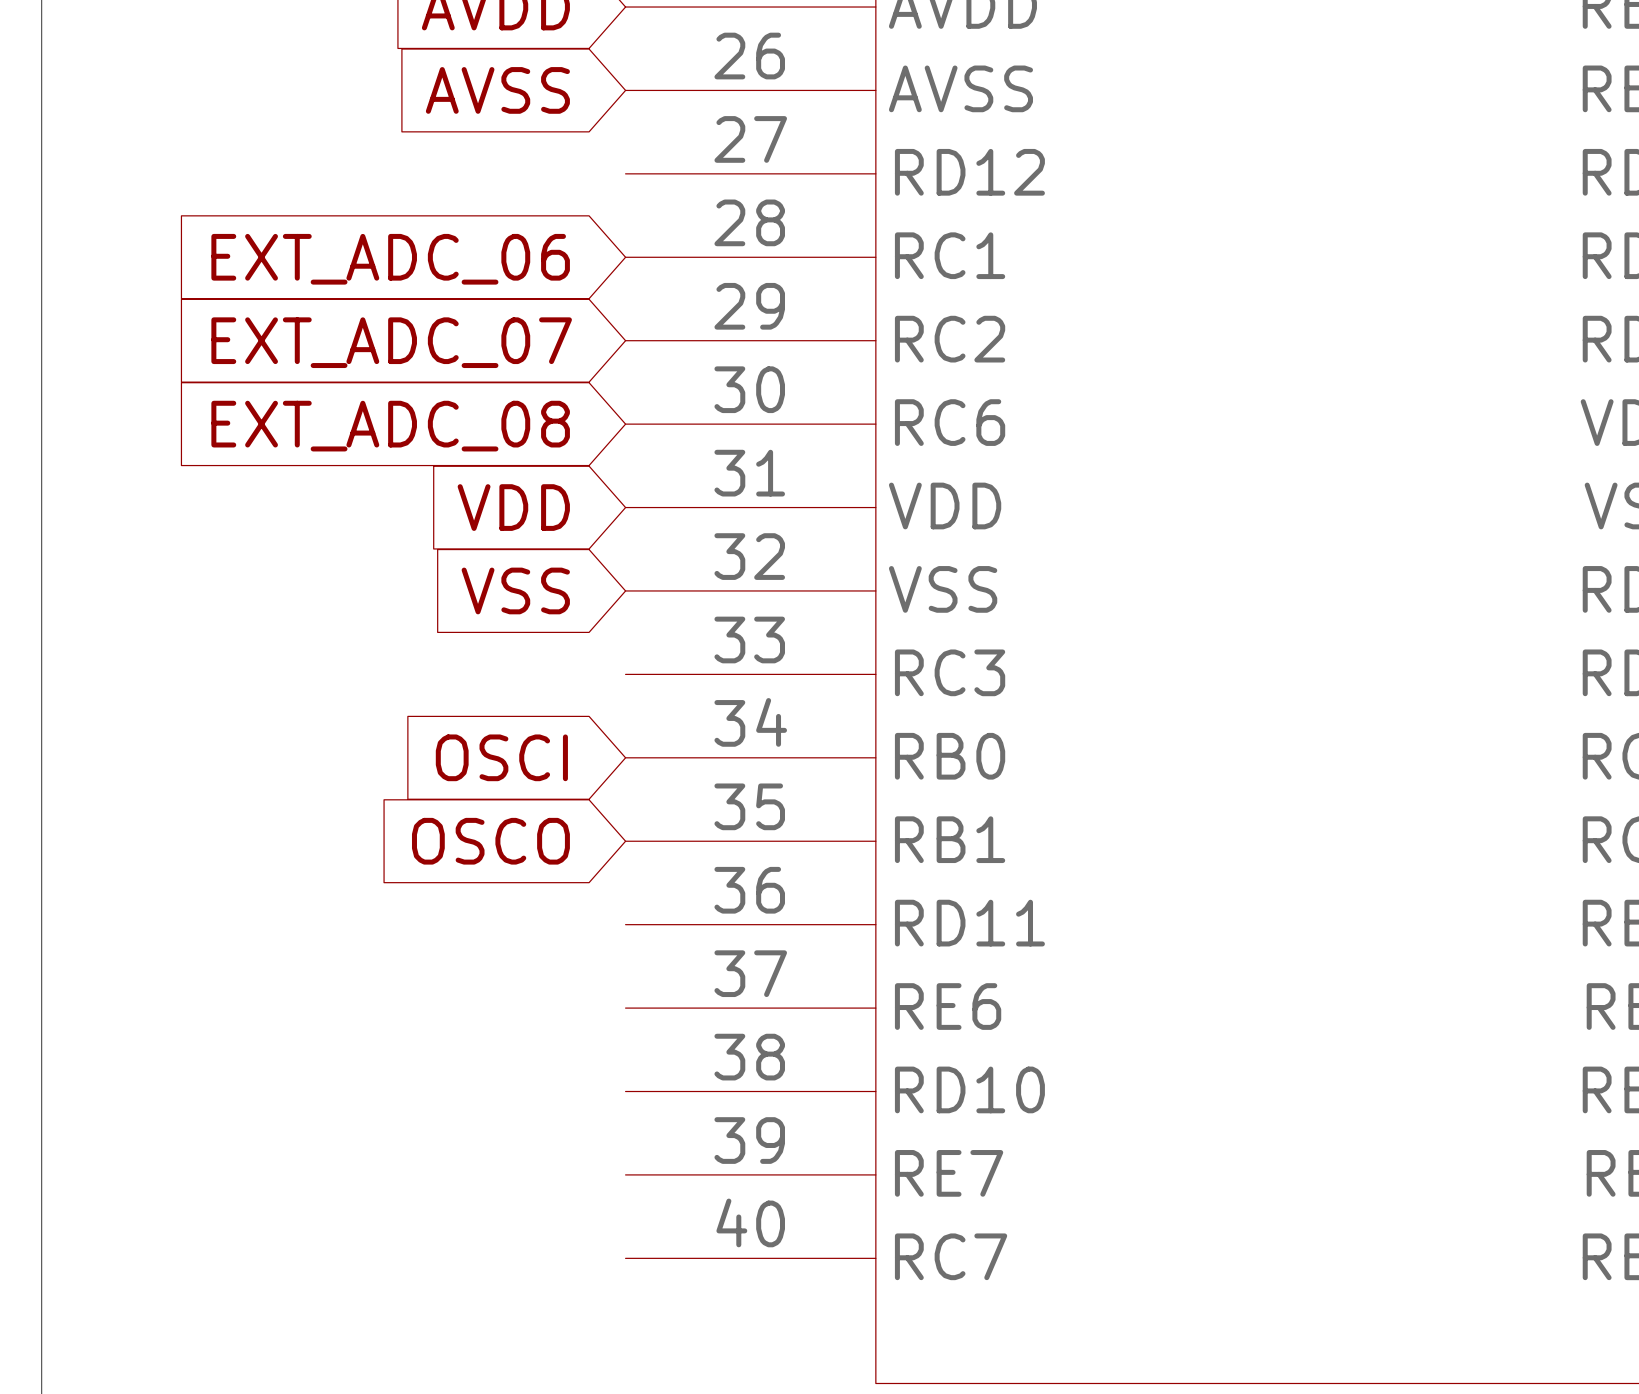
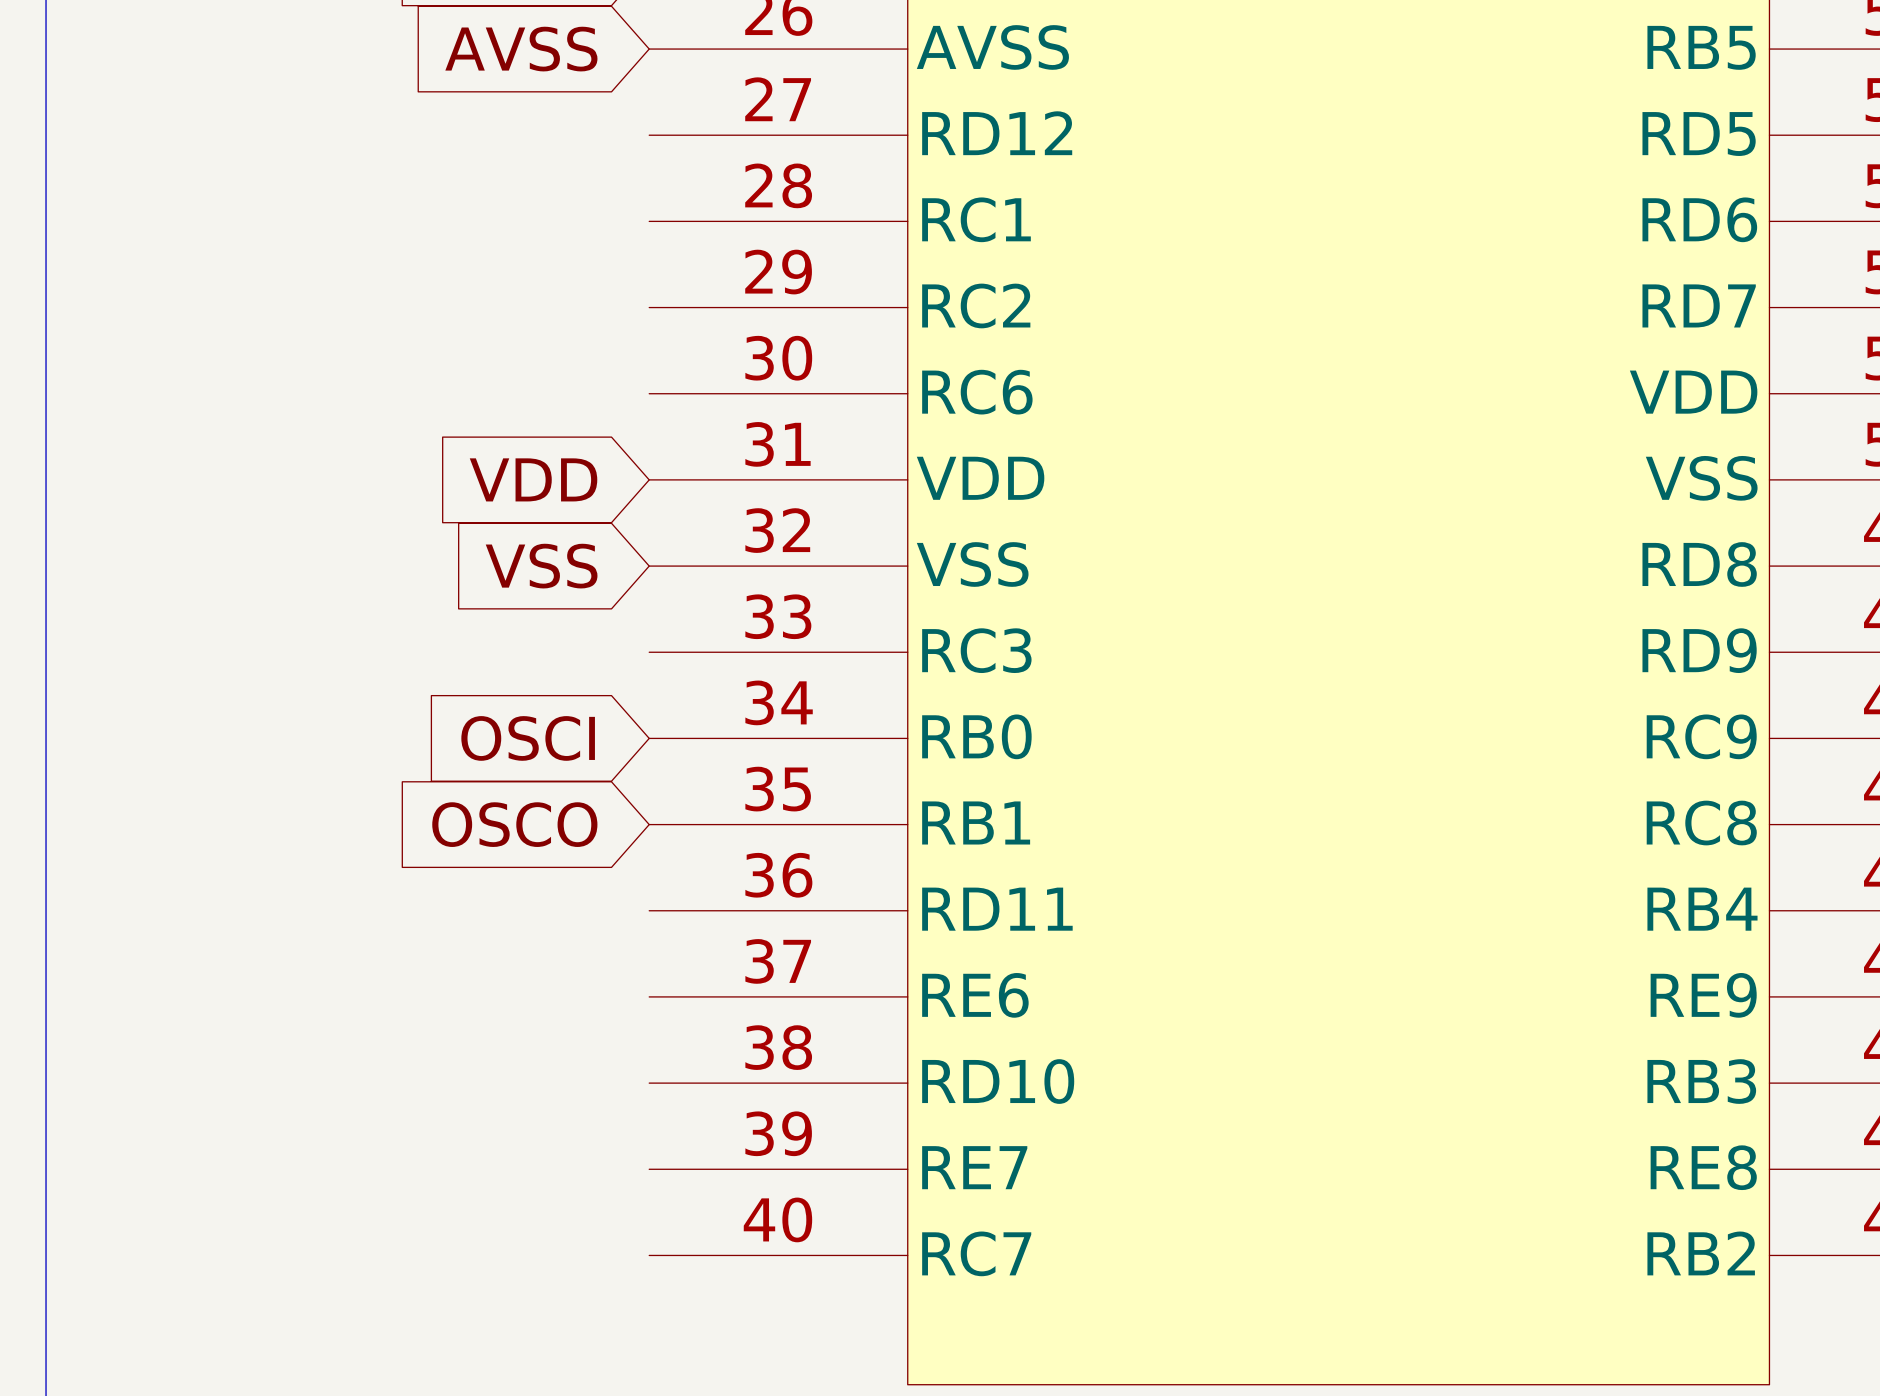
global label: EXT_ADC_06 (390, 259) -> none
global label: EXT_ADC_07 (391, 342) -> none
global label: EXT_ADC_08 (390, 426) -> none

